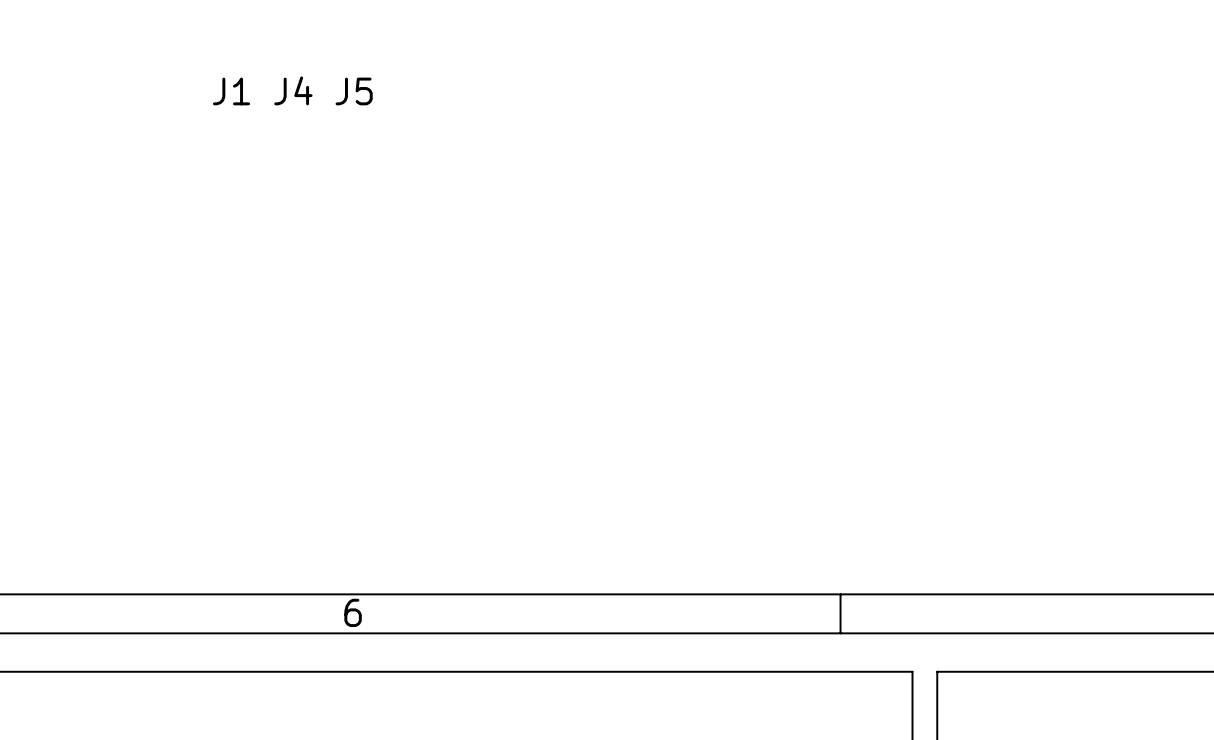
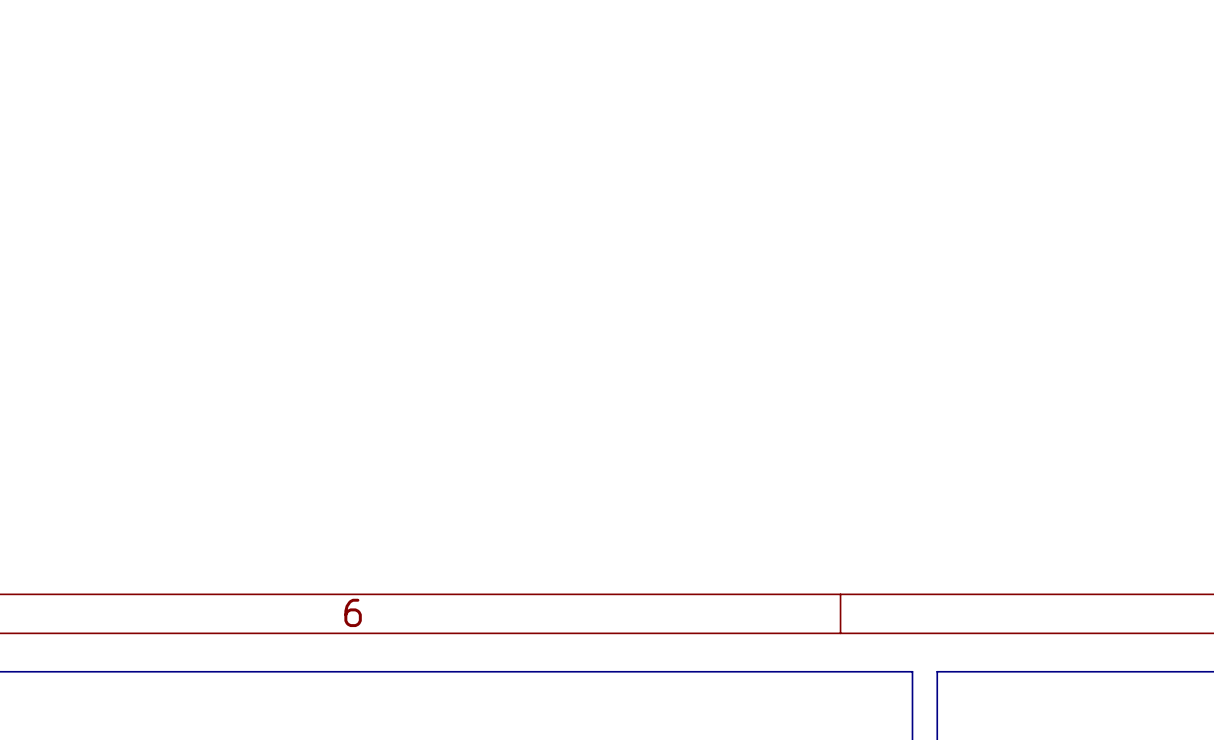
text: J1 J4 J5 (292, 90) -> none

